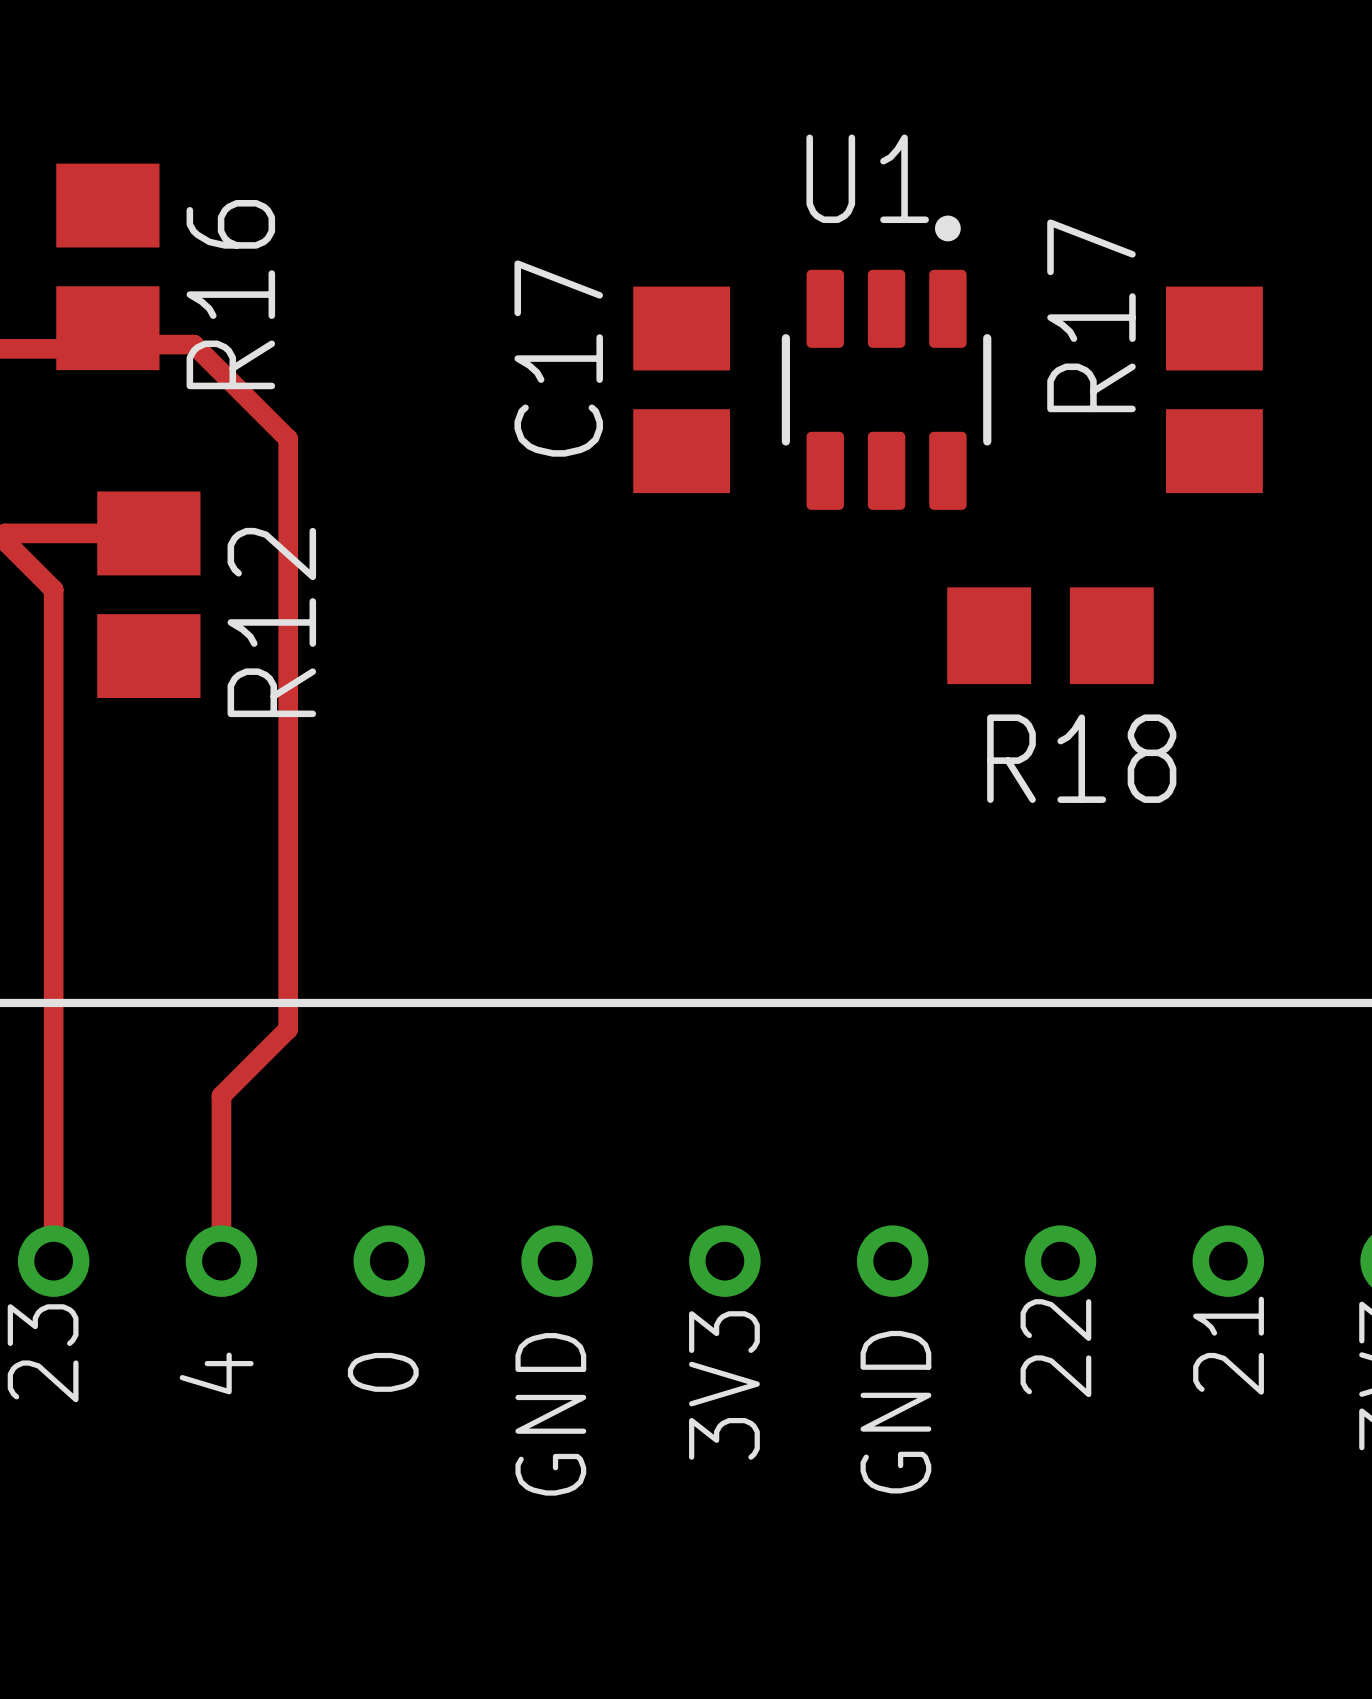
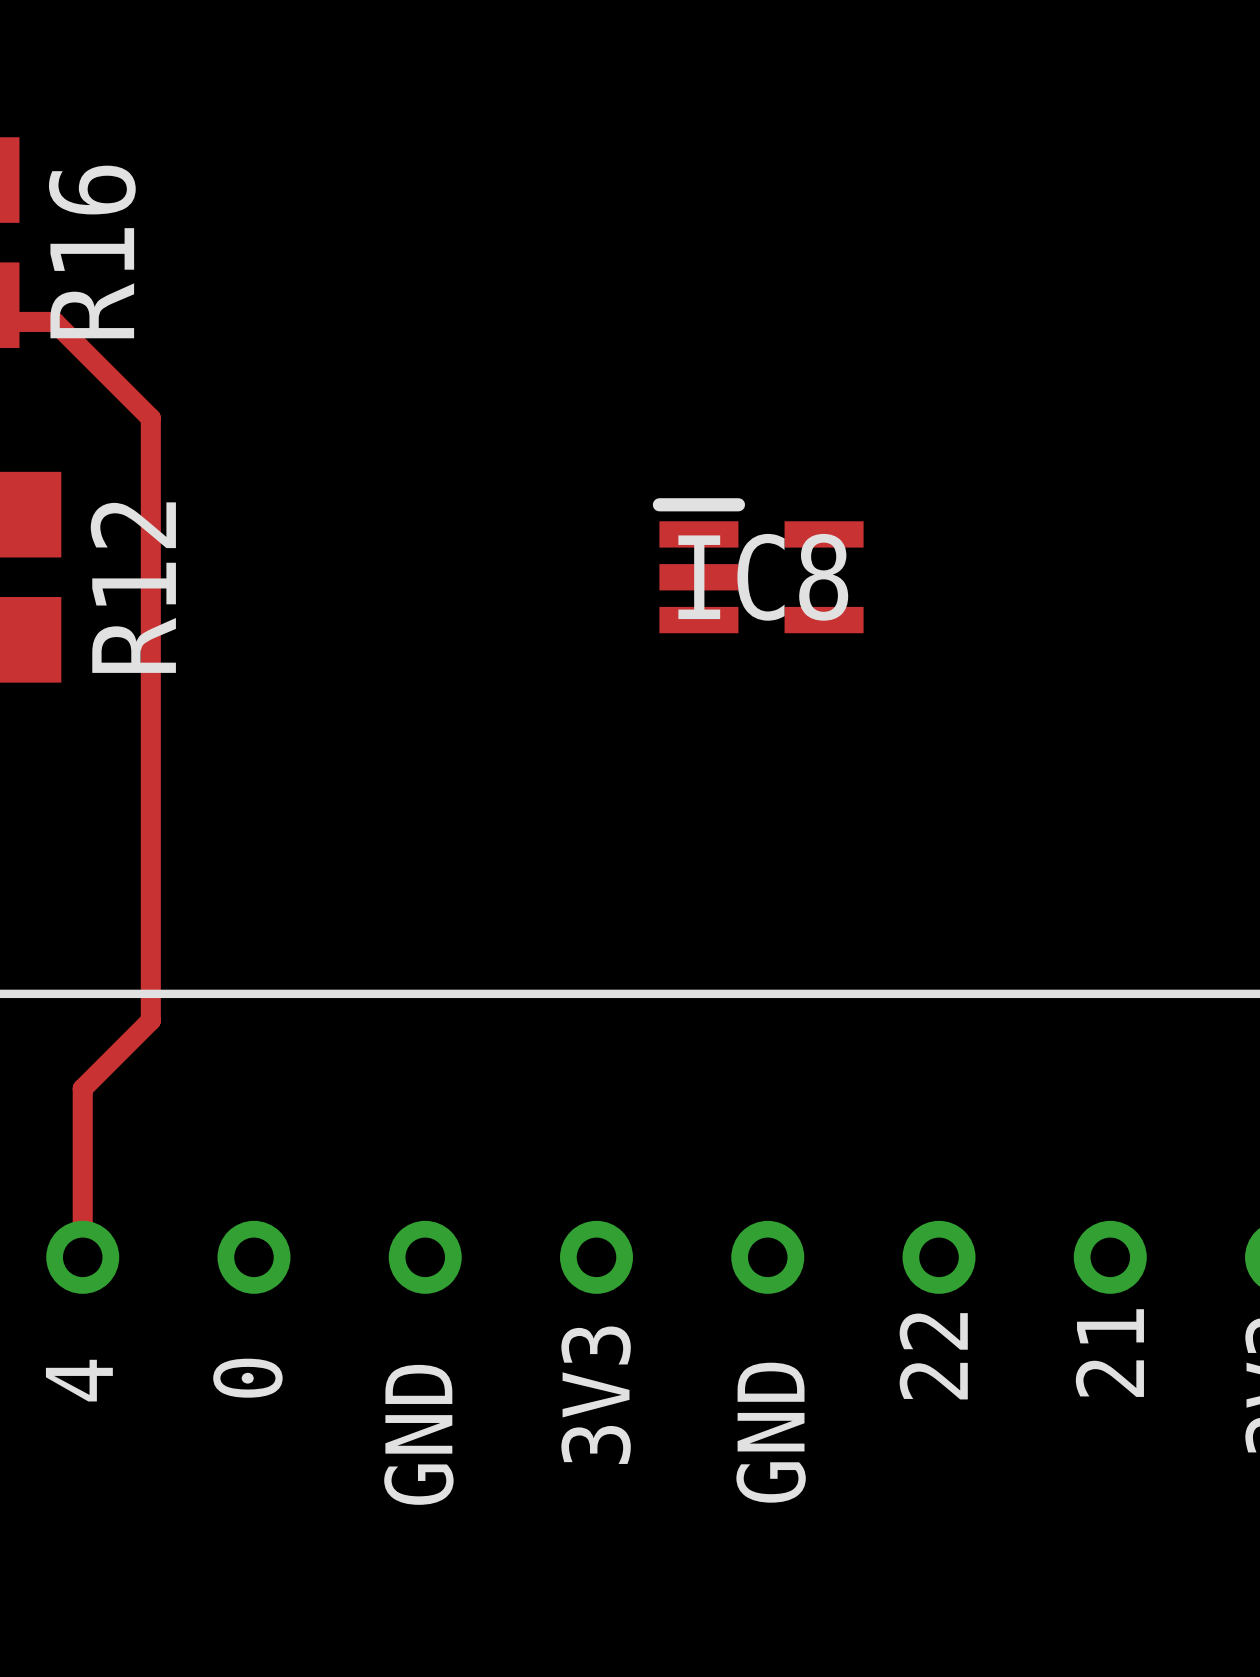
U1: (886, 362) -> none
C17: (681, 389) -> none
R17: (1214, 389) -> none
IC8: none -> (758, 565)
R18: (1050, 635) -> none

